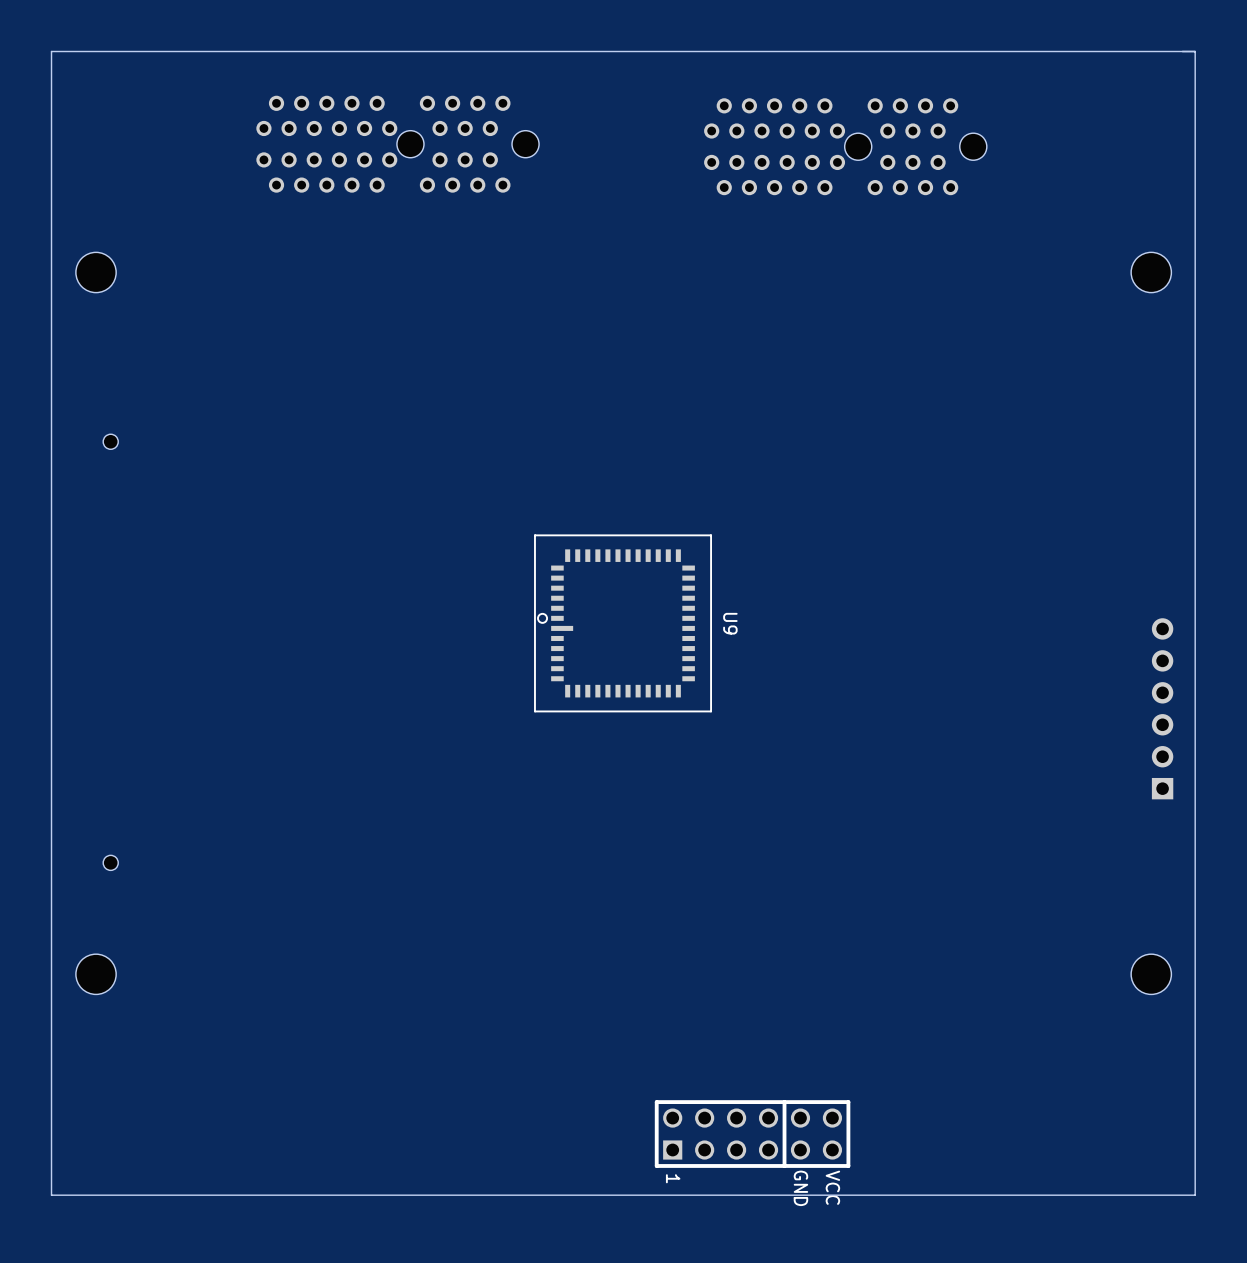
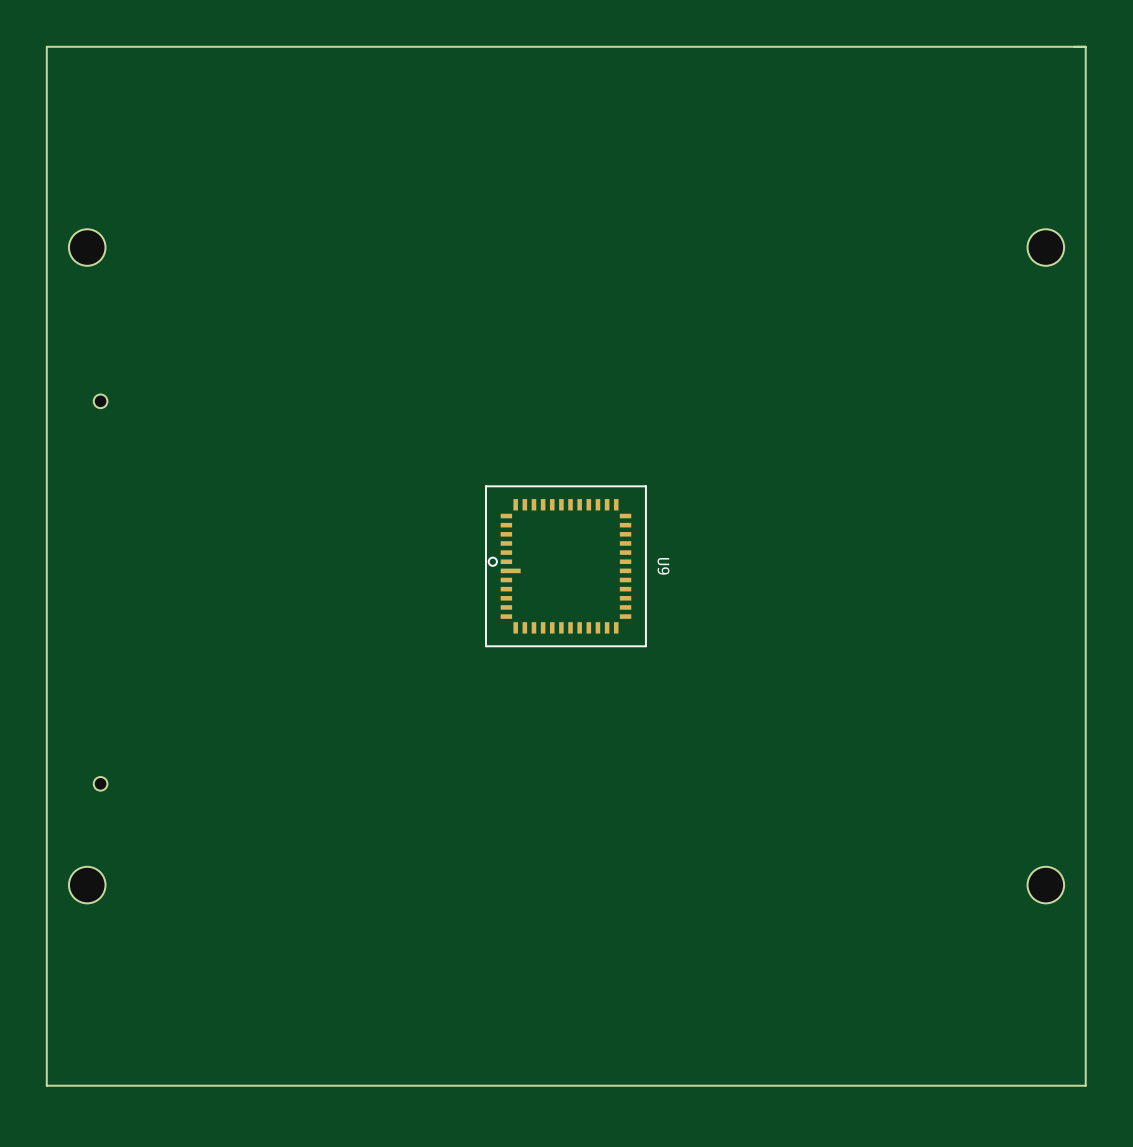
part: (397, 144) -> none
part: (845, 146) -> none
part: (1162, 708) -> none
part: (752, 1134) -> none

